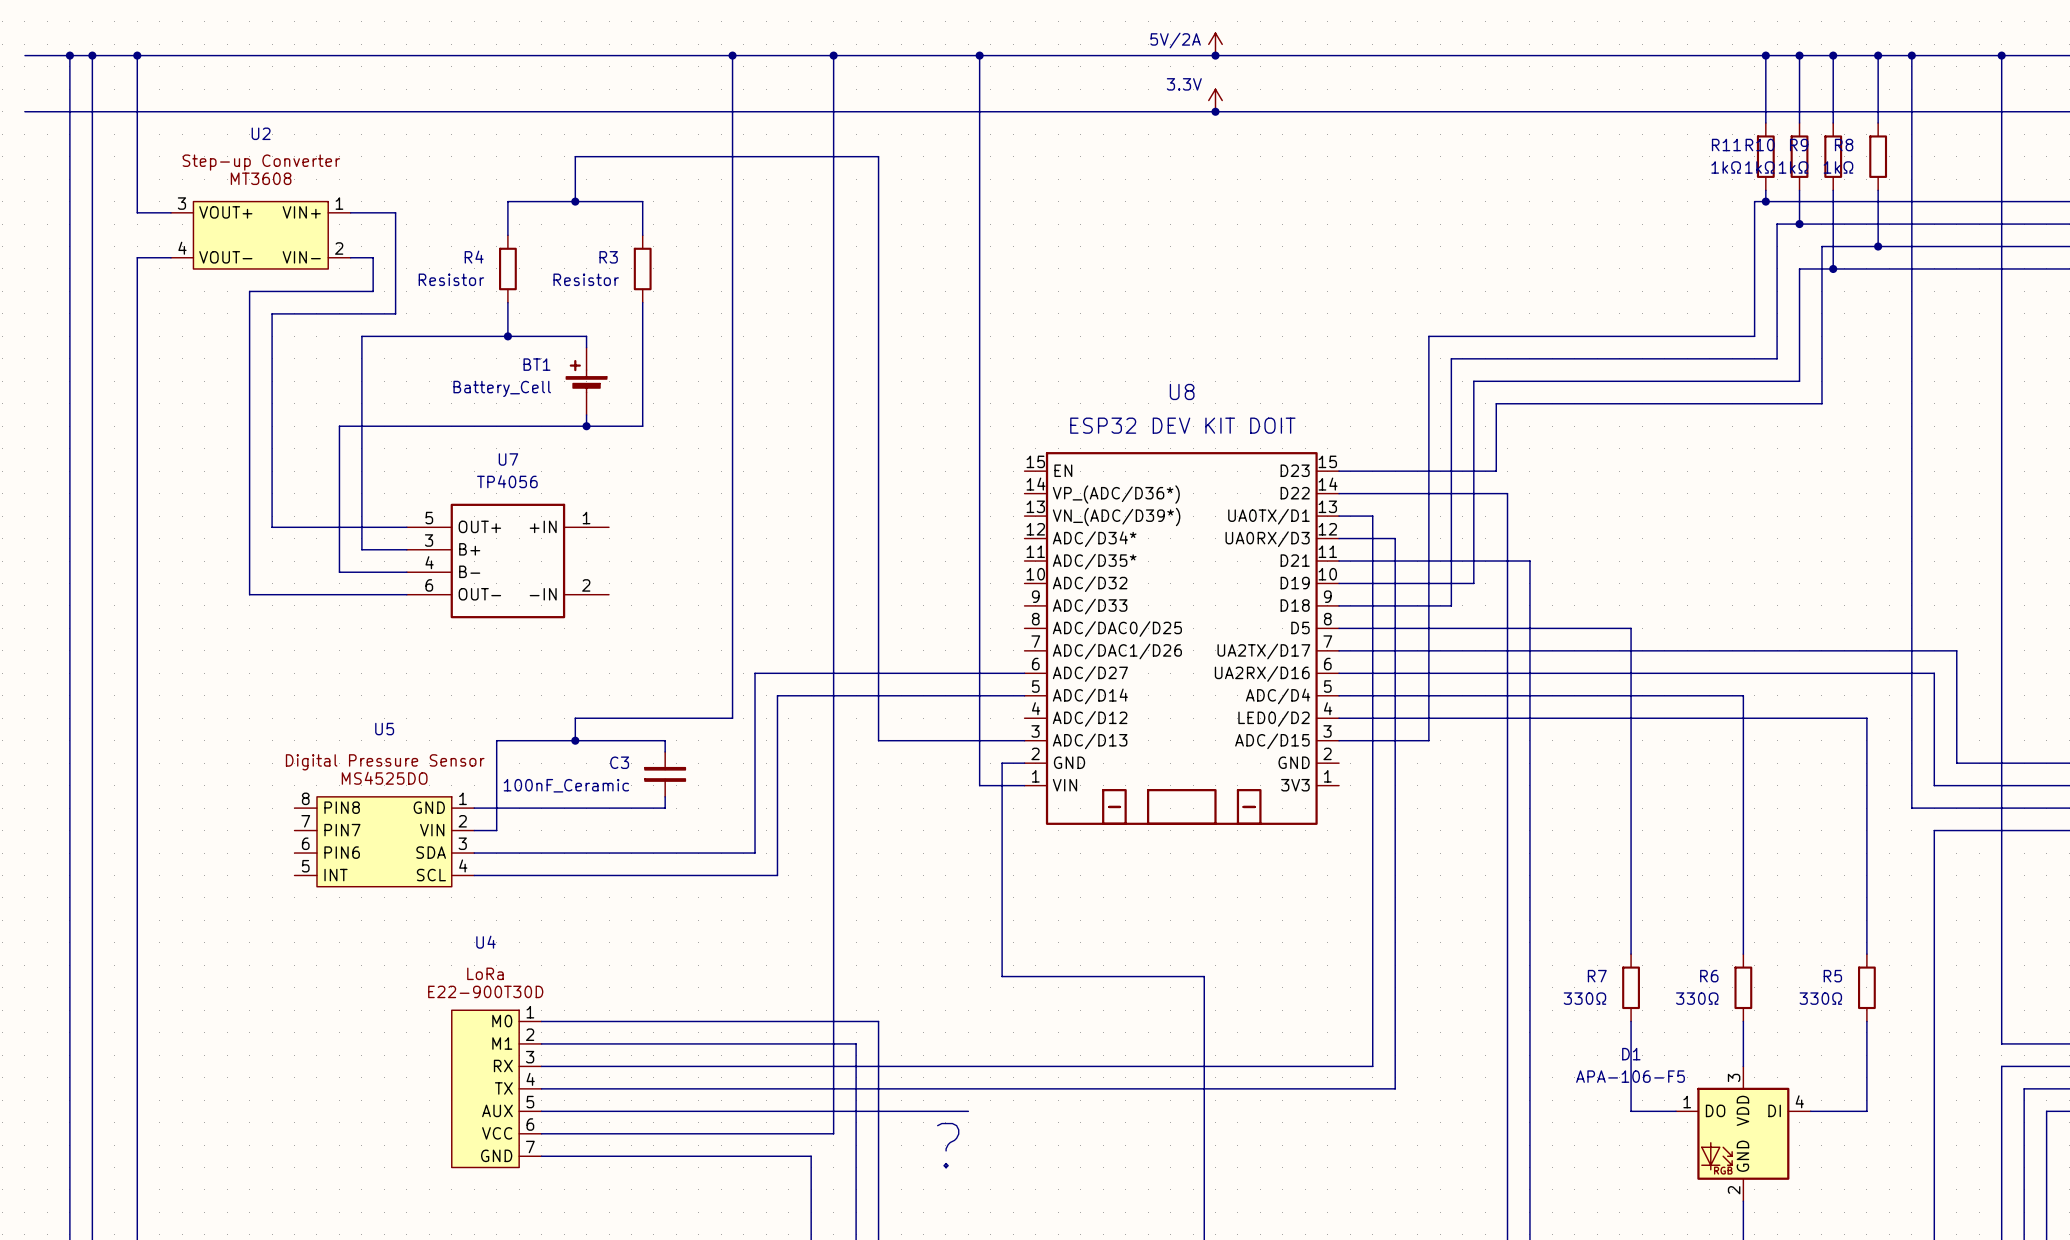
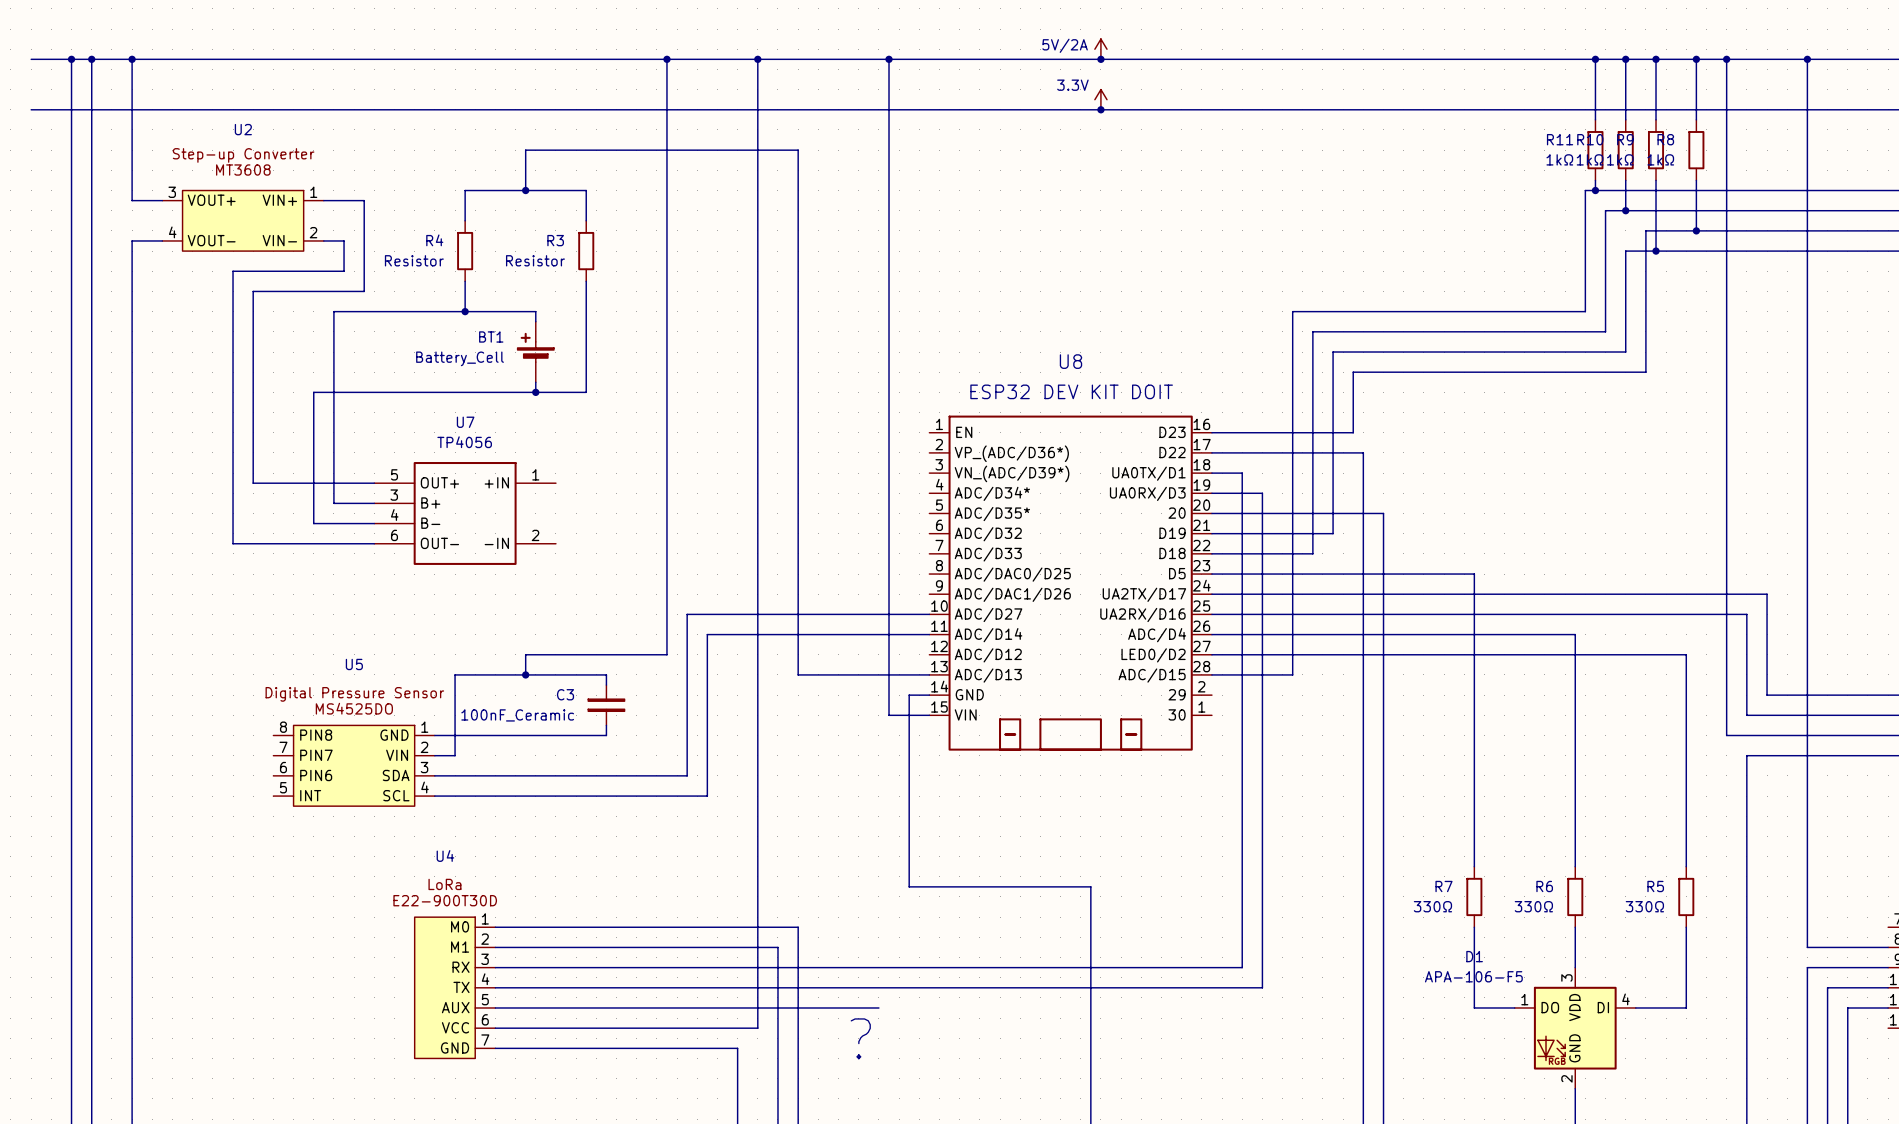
U8 symbol: [1024, 452, 1340, 825] -> [929, 415, 1212, 751]

